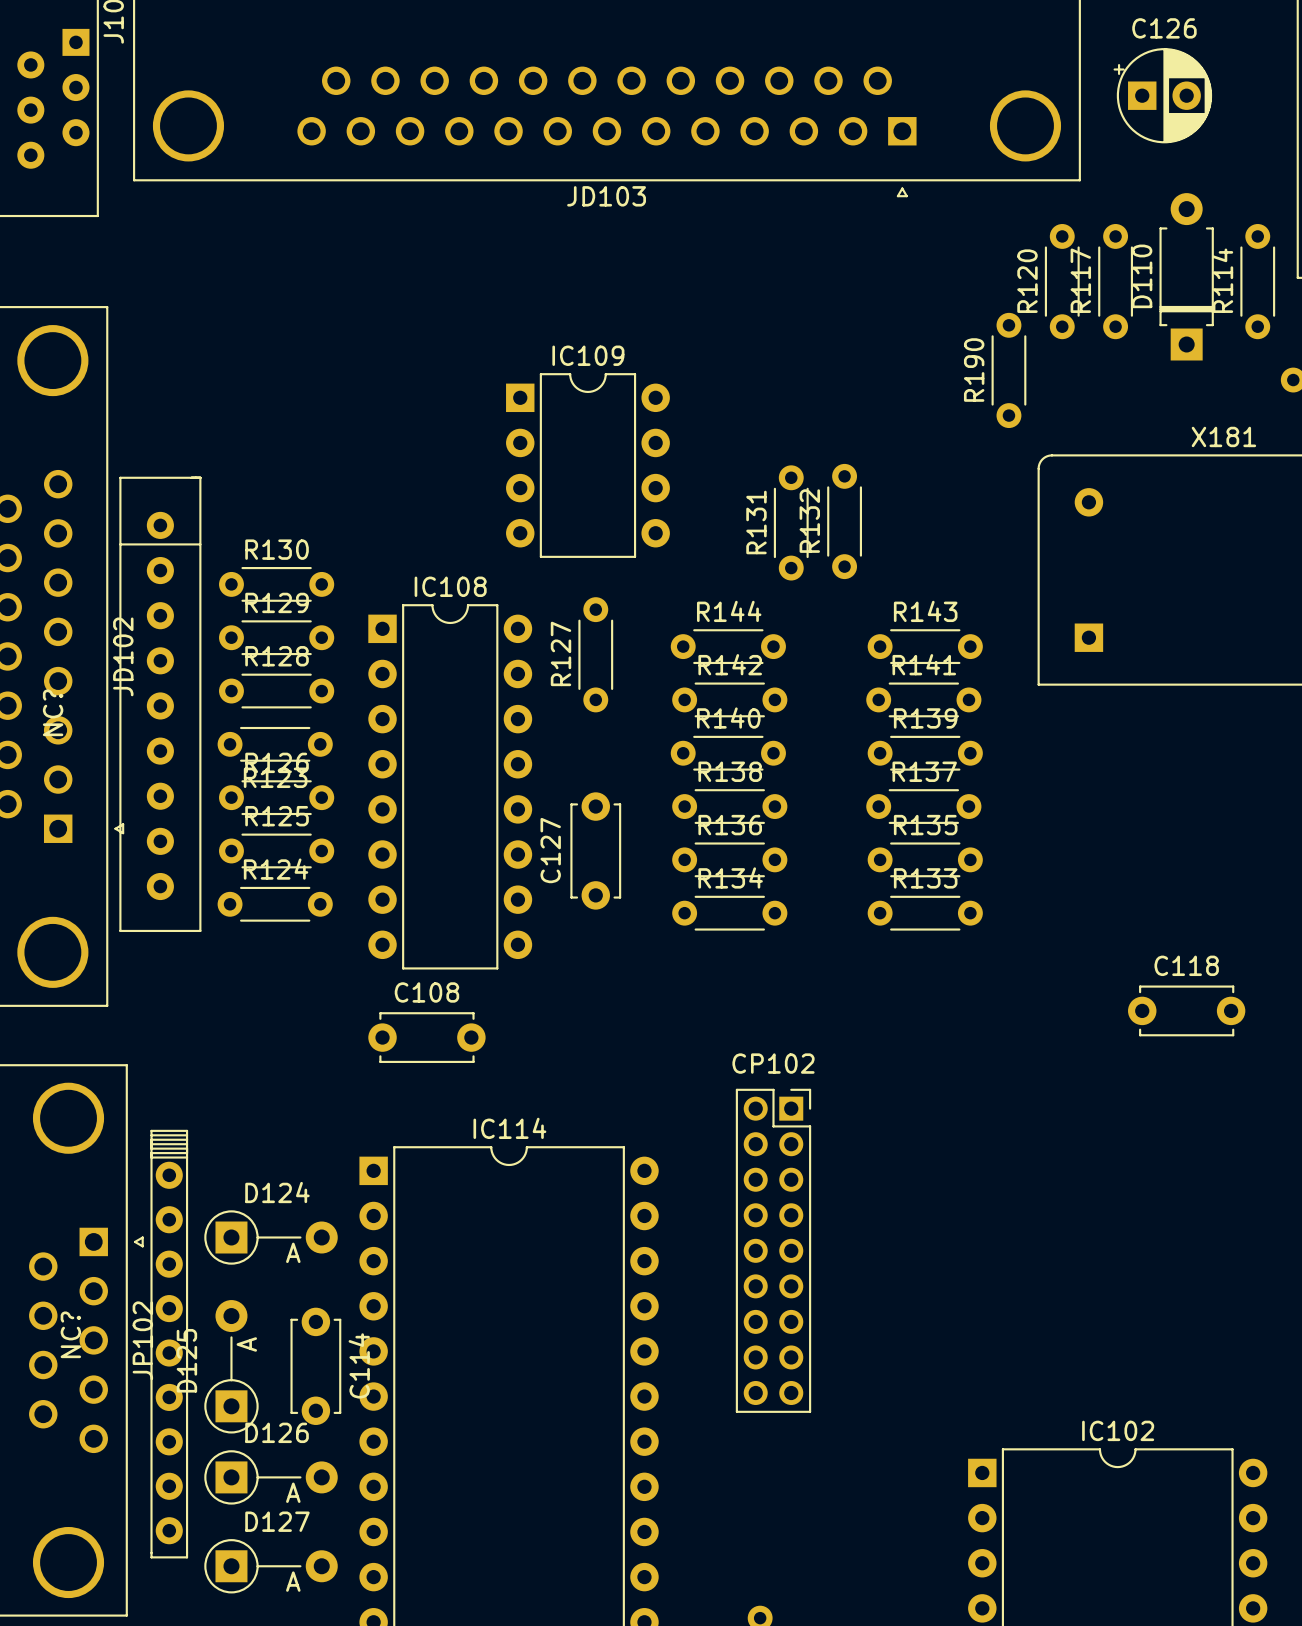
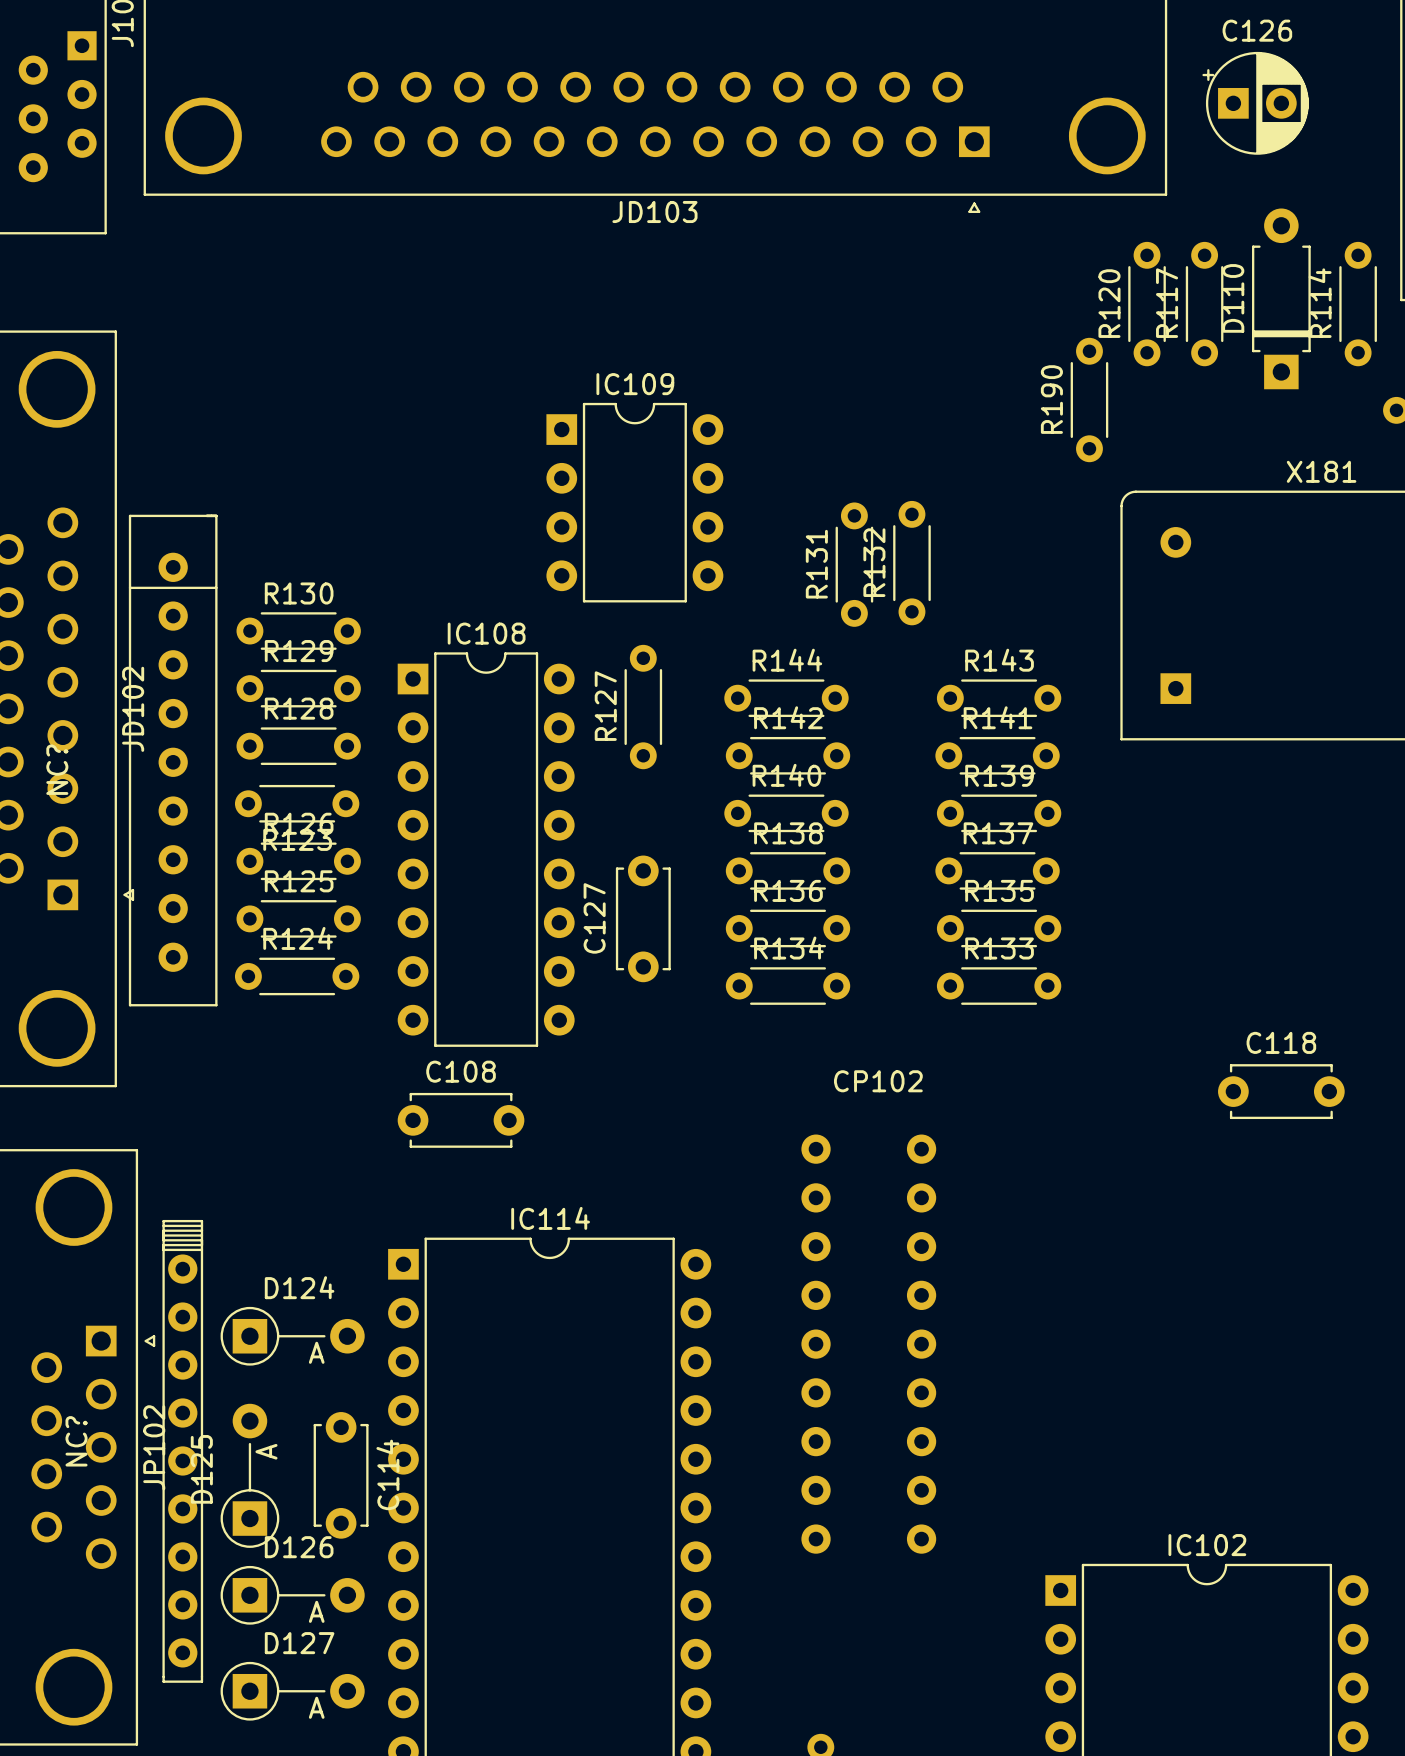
CP102 name position: CP102 (773, 1063) -> CP102 (878, 1081)
CP102 footprint: [735, 1088, 812, 1413] -> [801, 1134, 937, 1554]

